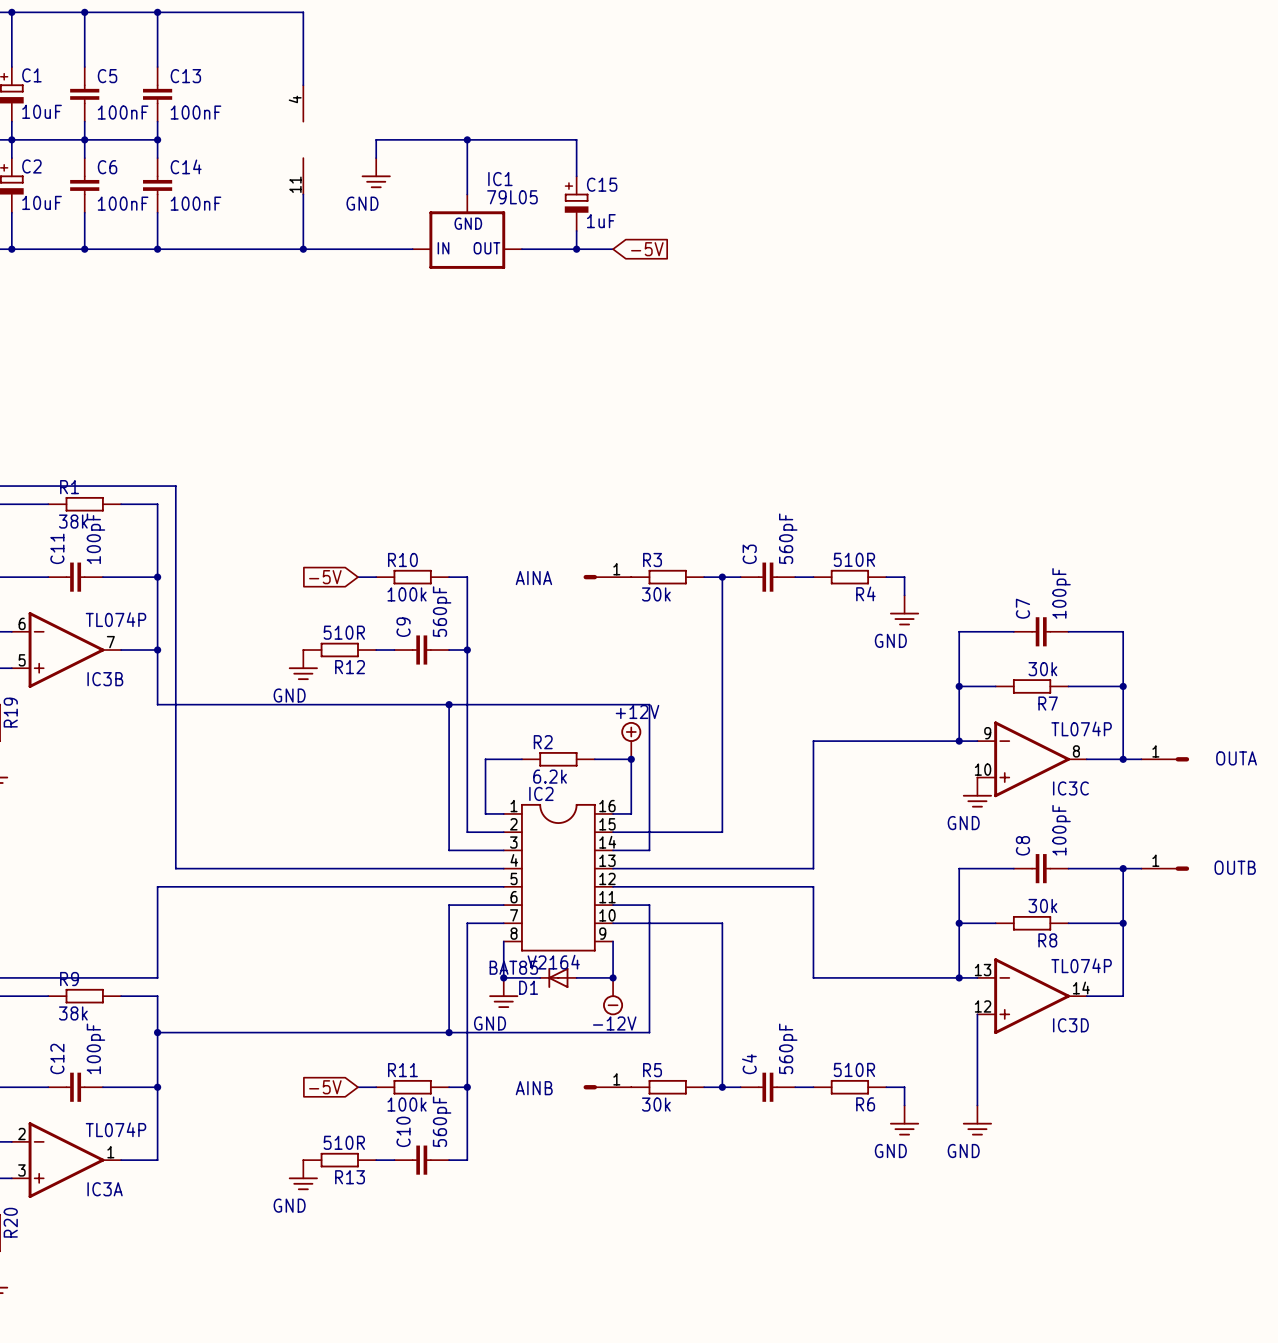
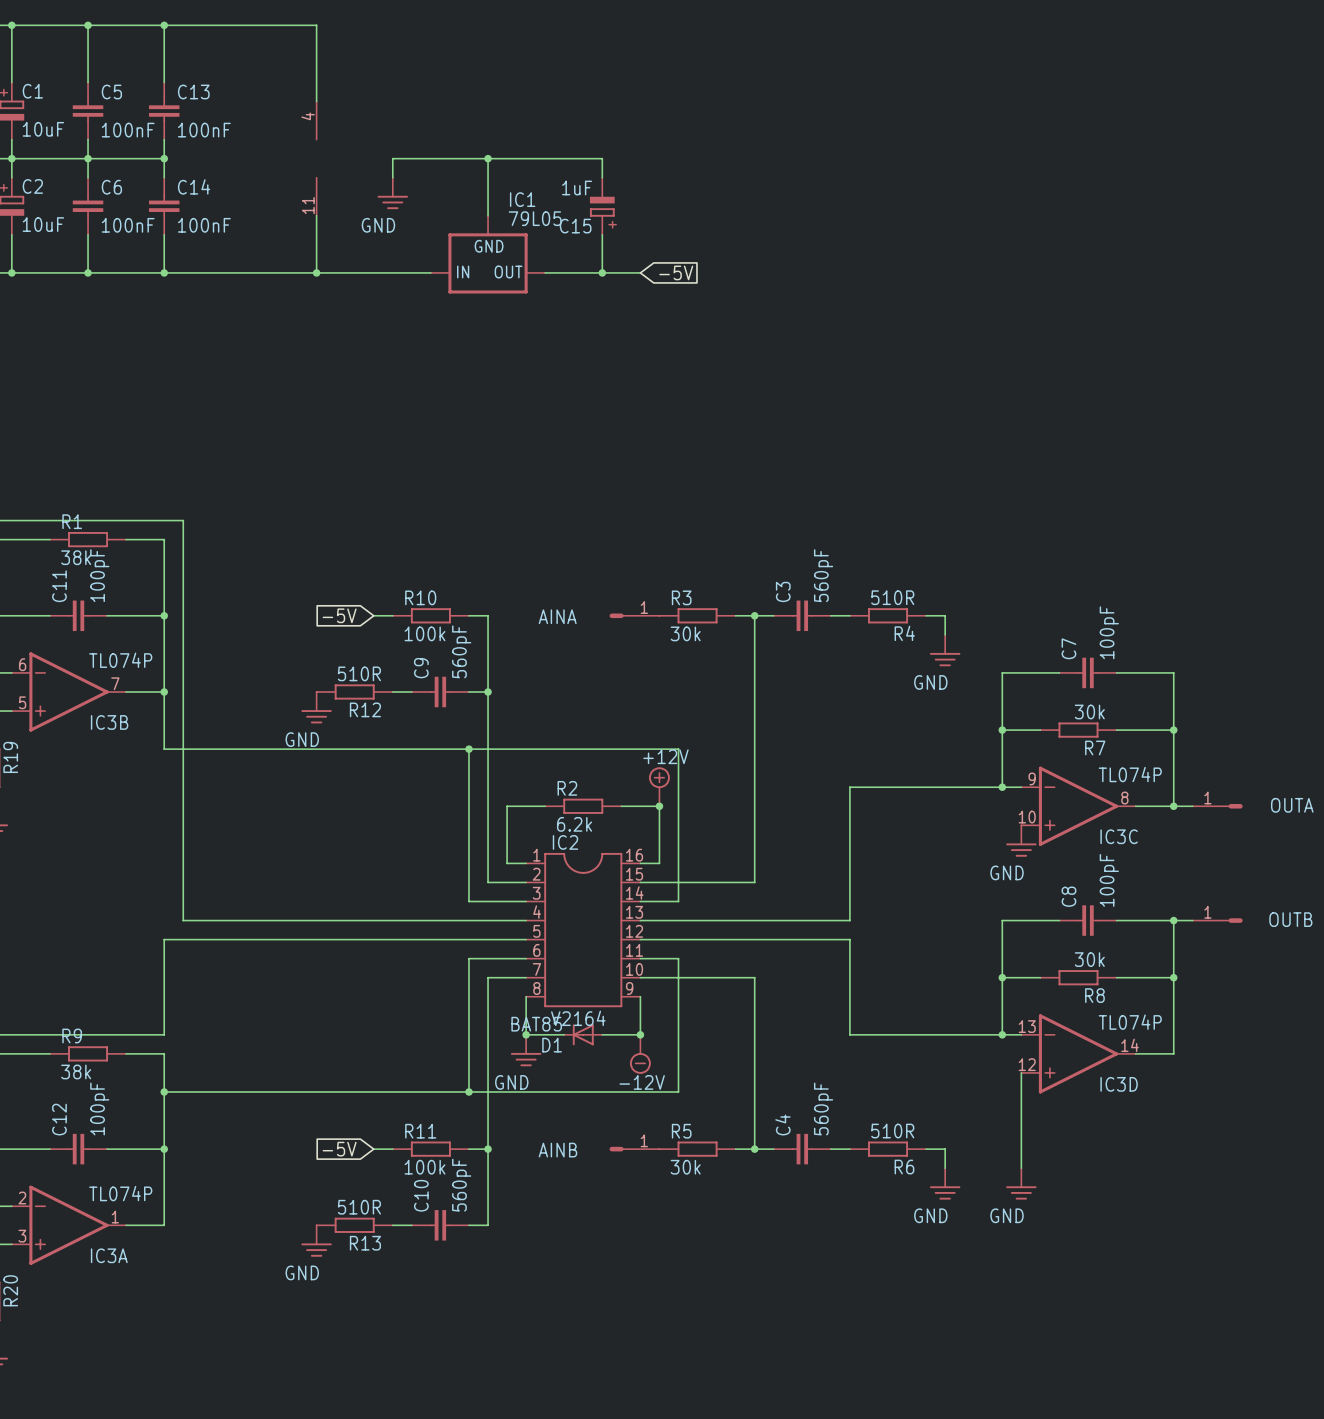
C15 symbol: [564, 176, 589, 231] -> [589, 177, 615, 235]
C15 name position: C15 (602, 184) -> C15 (575, 226)
C15 value position: 1uF (601, 221) -> 1uF (577, 187)

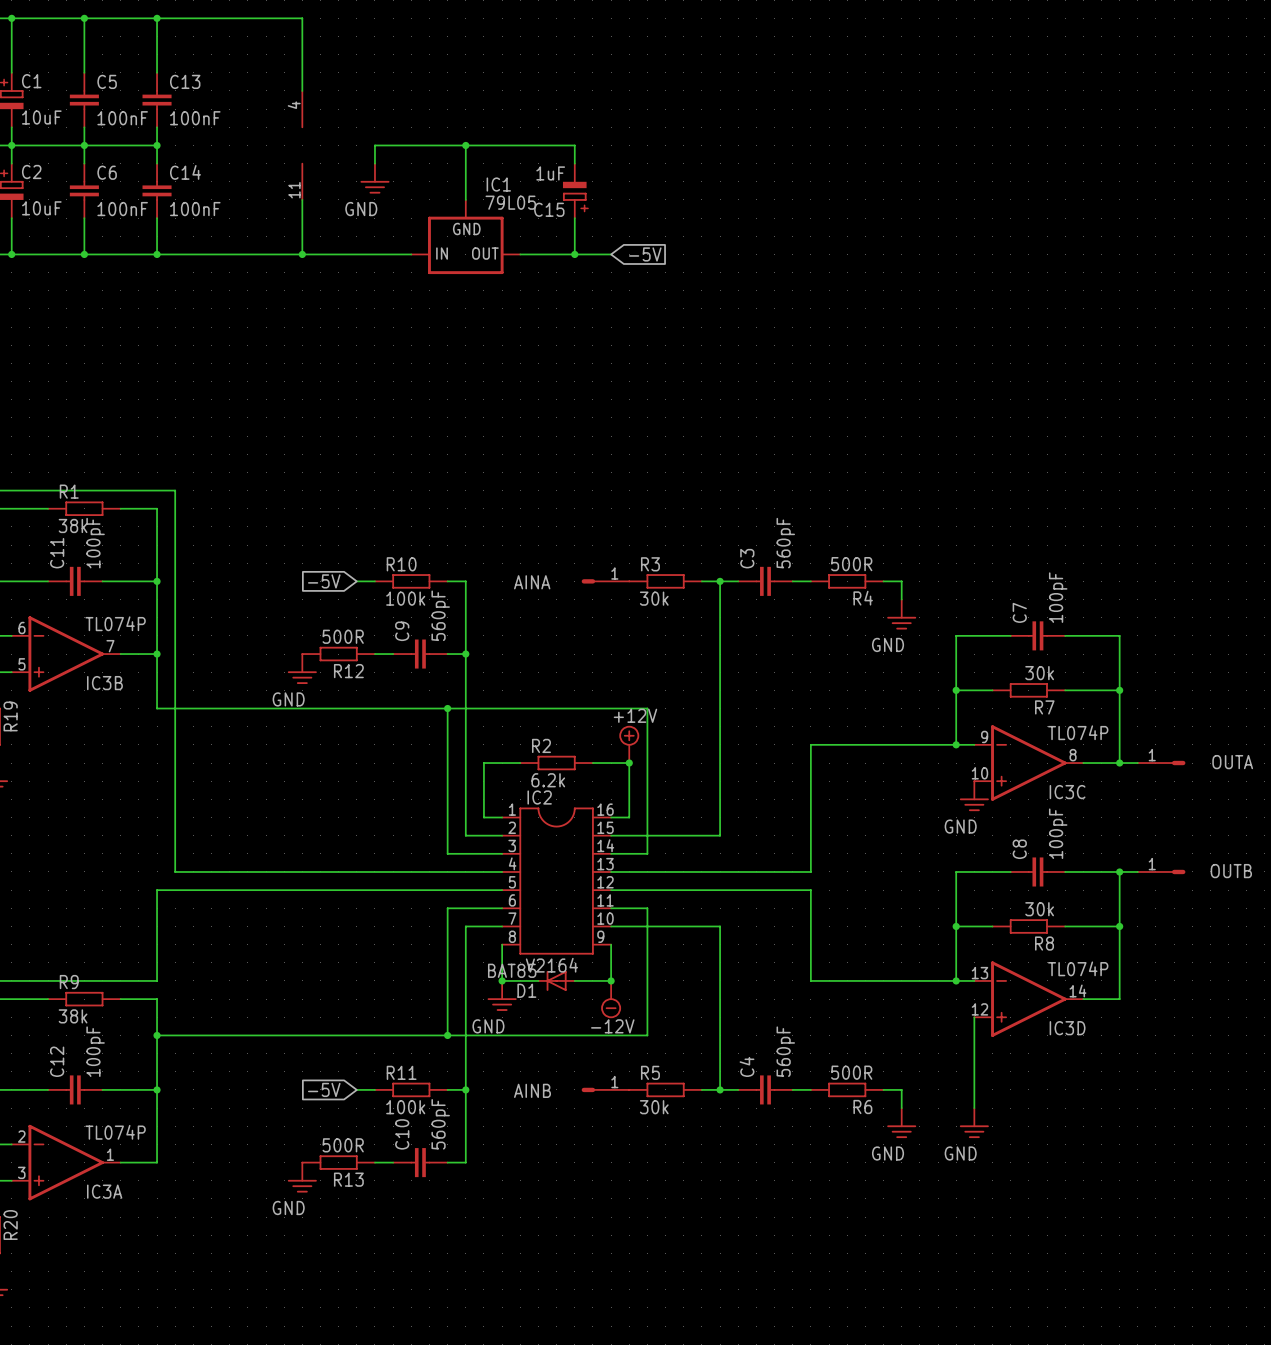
R4 value: 510R (892, 597) -> 500R (851, 564)
R12 value: 510R (359, 673) -> 500R (343, 636)
R6 value: 510R (892, 1131) -> 500R (851, 1072)
R13 value: 510R (359, 1207) -> 500R (343, 1145)

